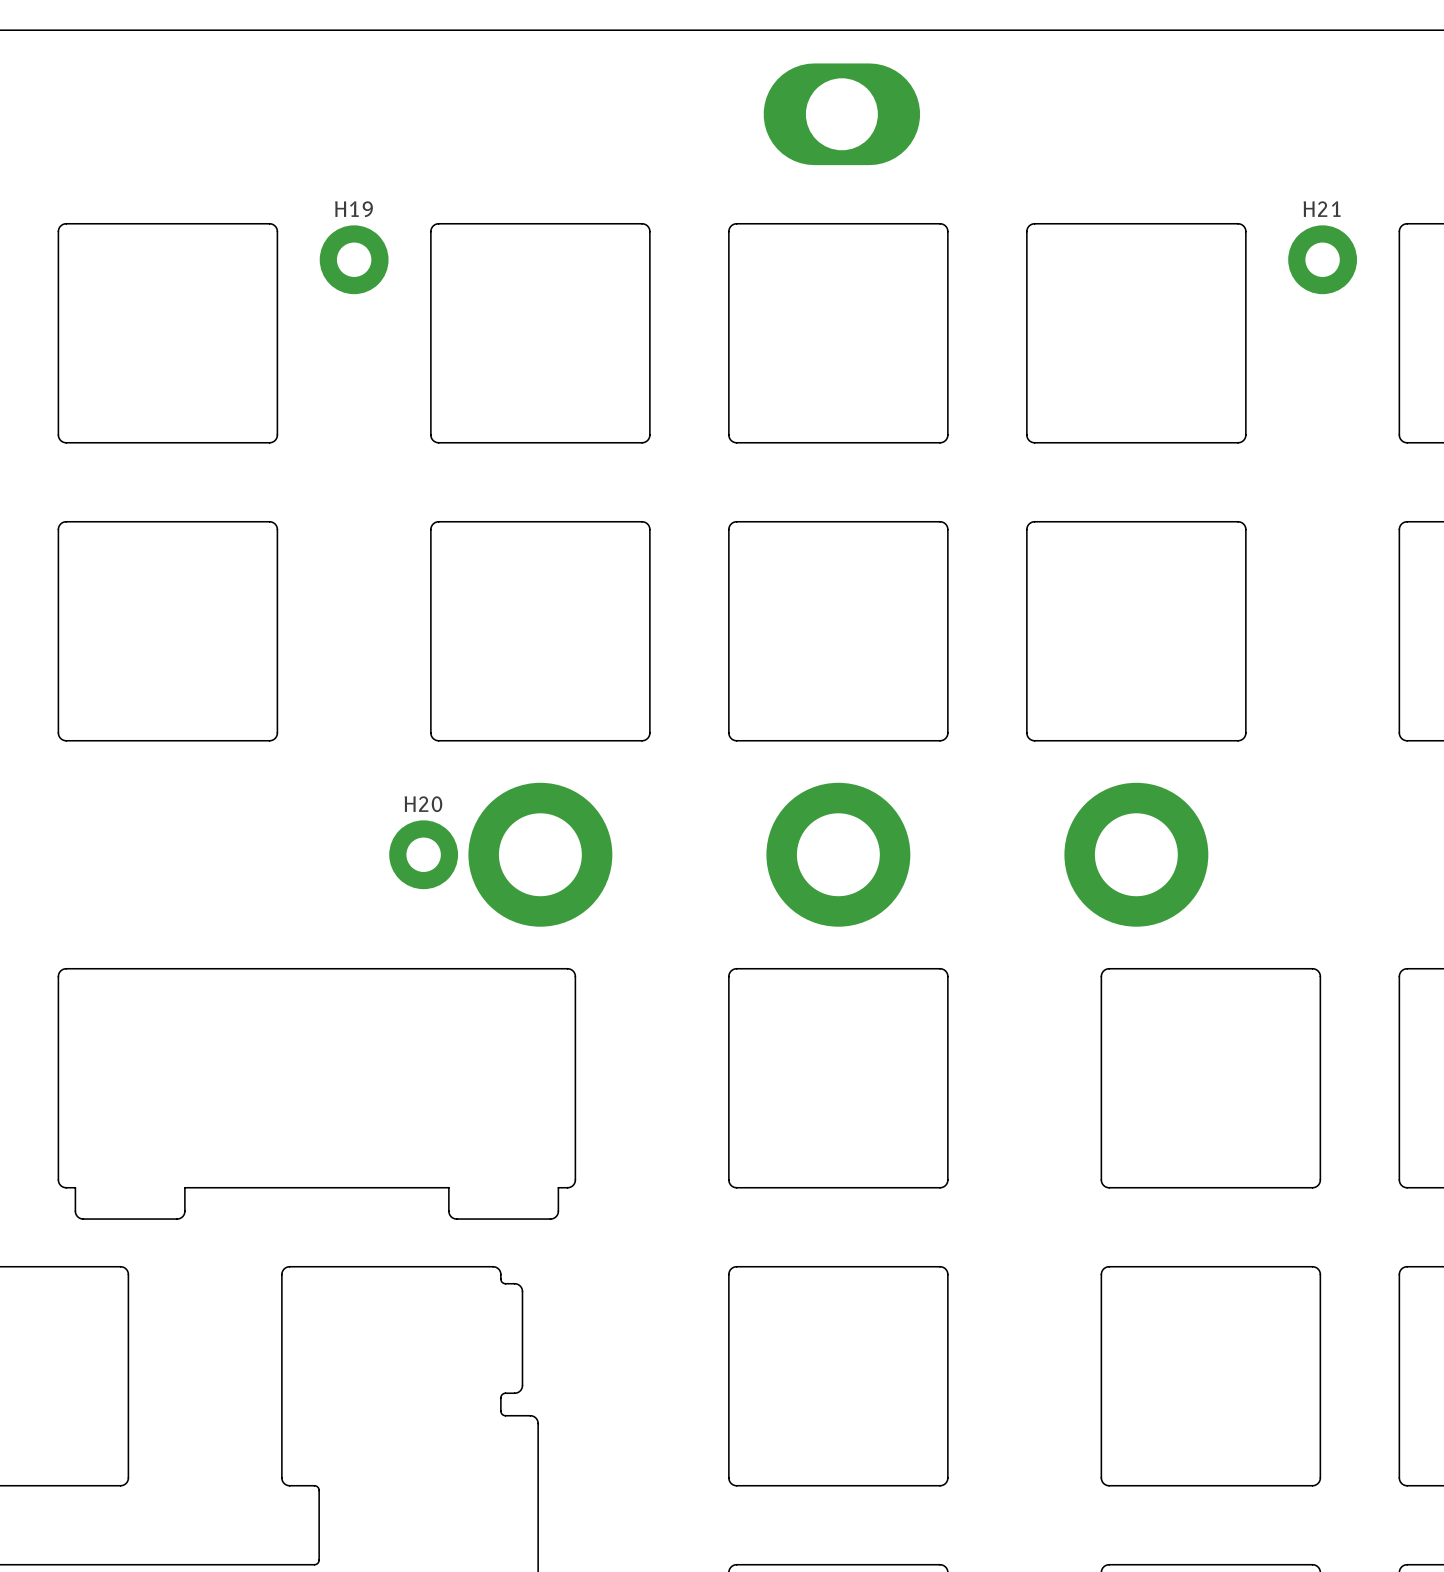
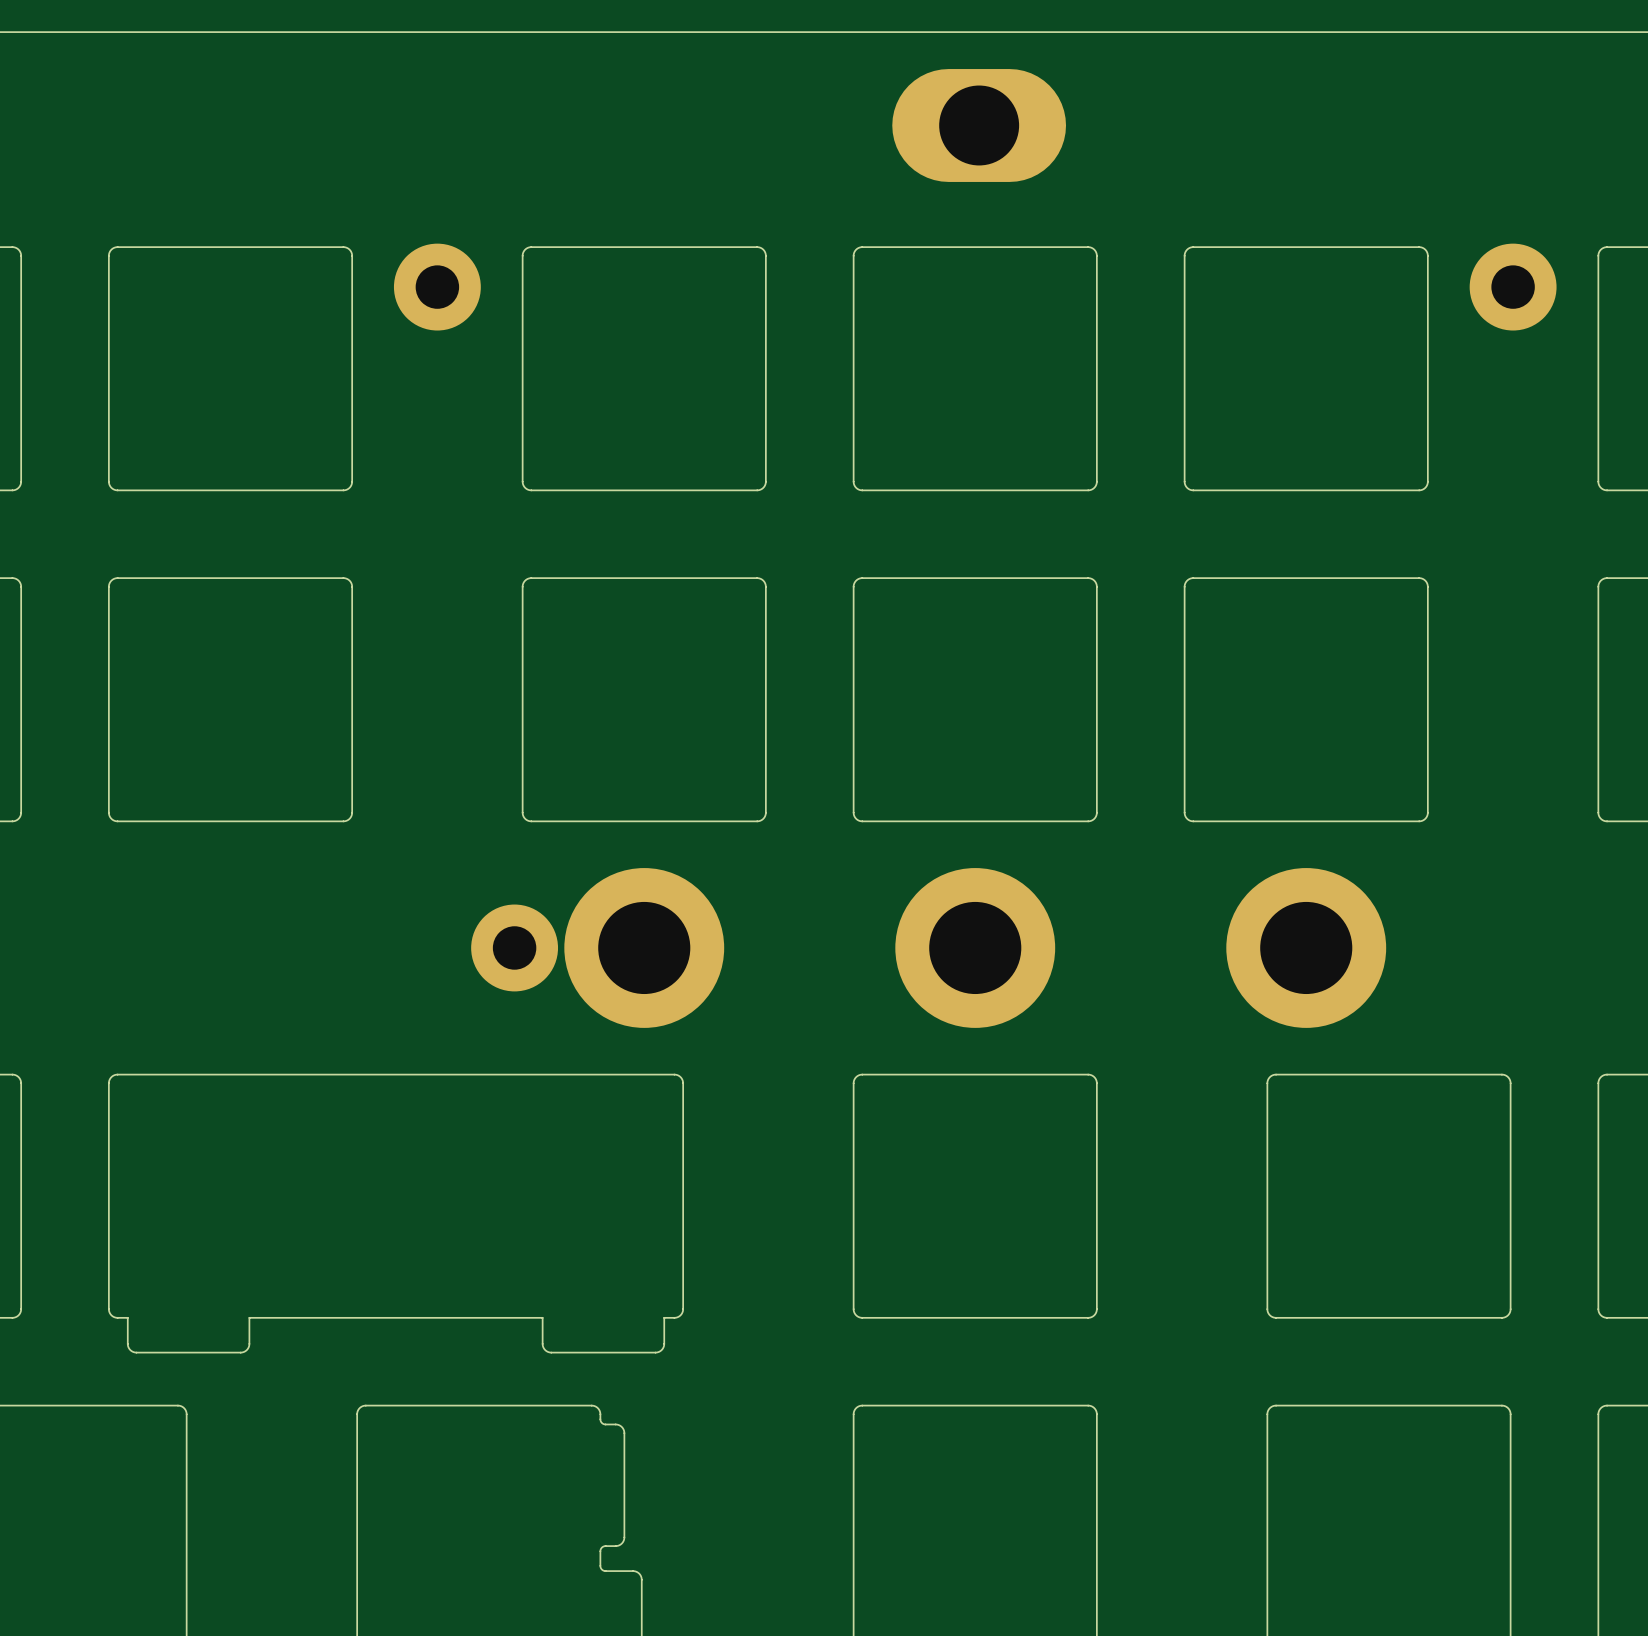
H19: (354, 259) -> none
part: none -> (437, 287)
H21: (1322, 259) -> none
part: none -> (1513, 287)
H20: (423, 854) -> none
part: none -> (514, 947)

